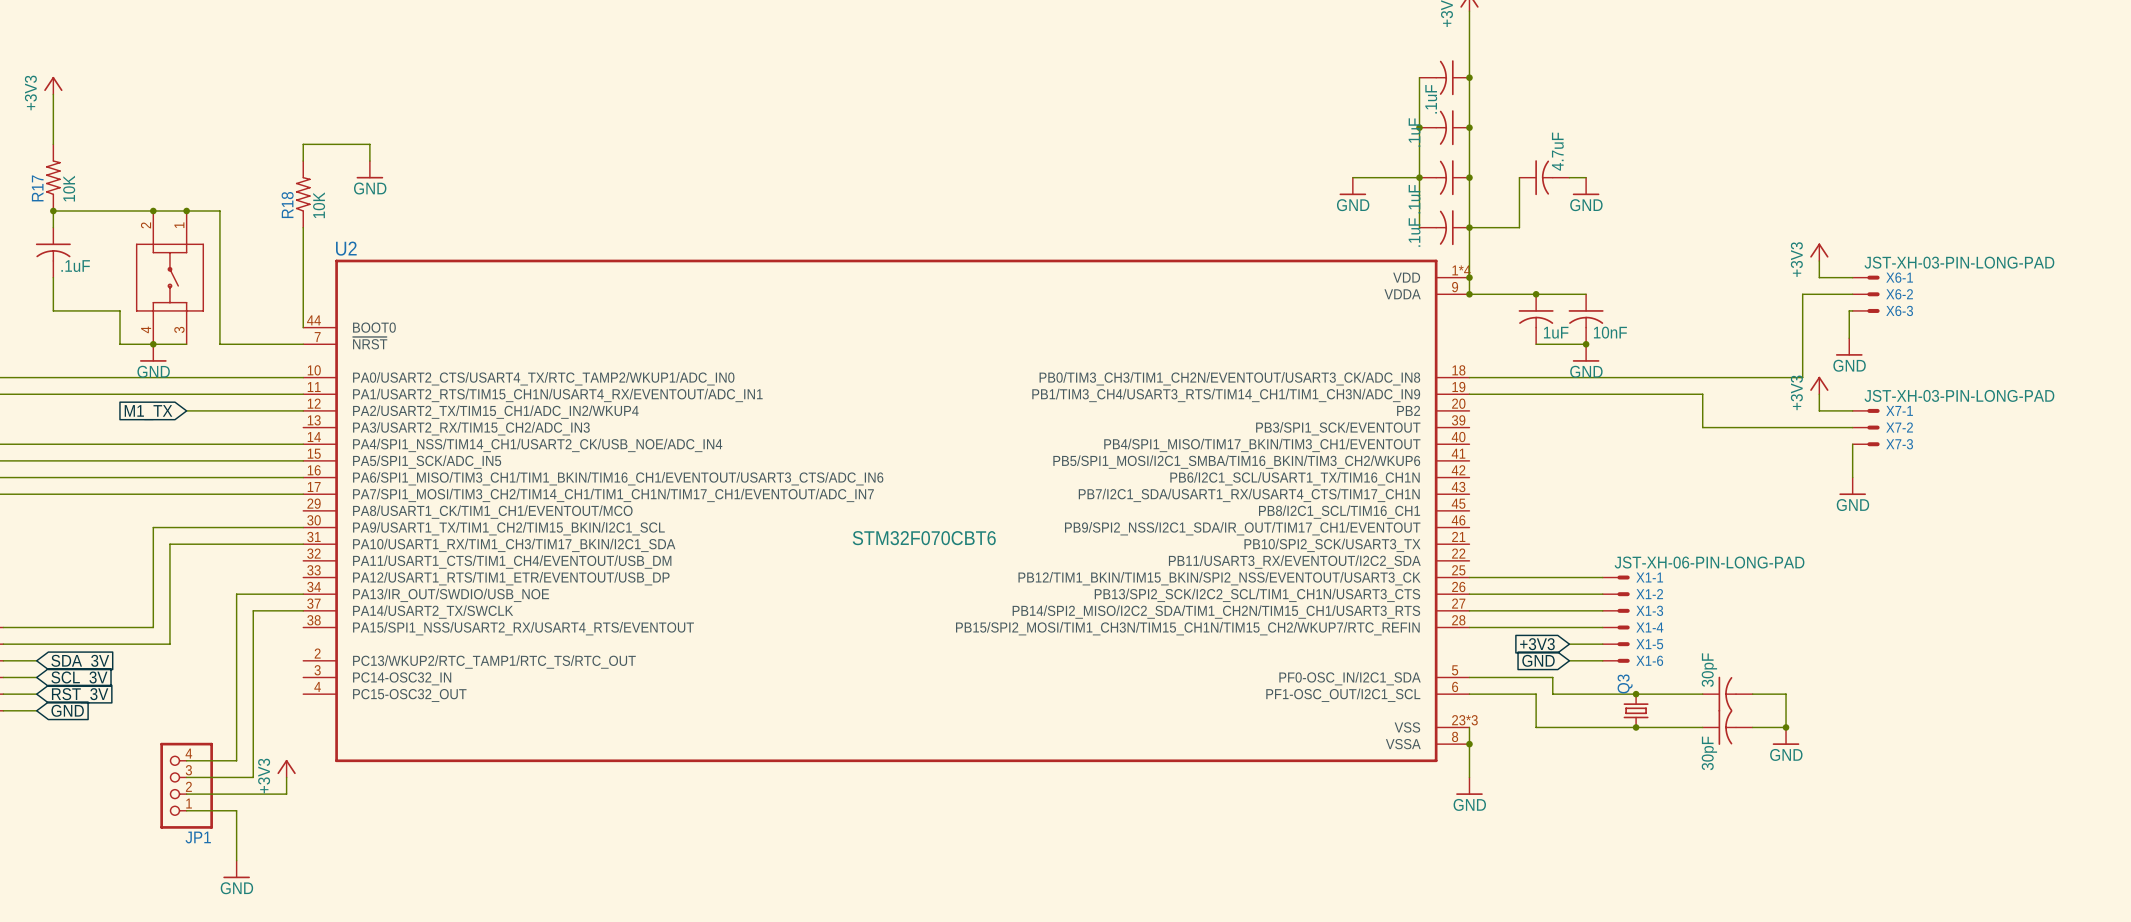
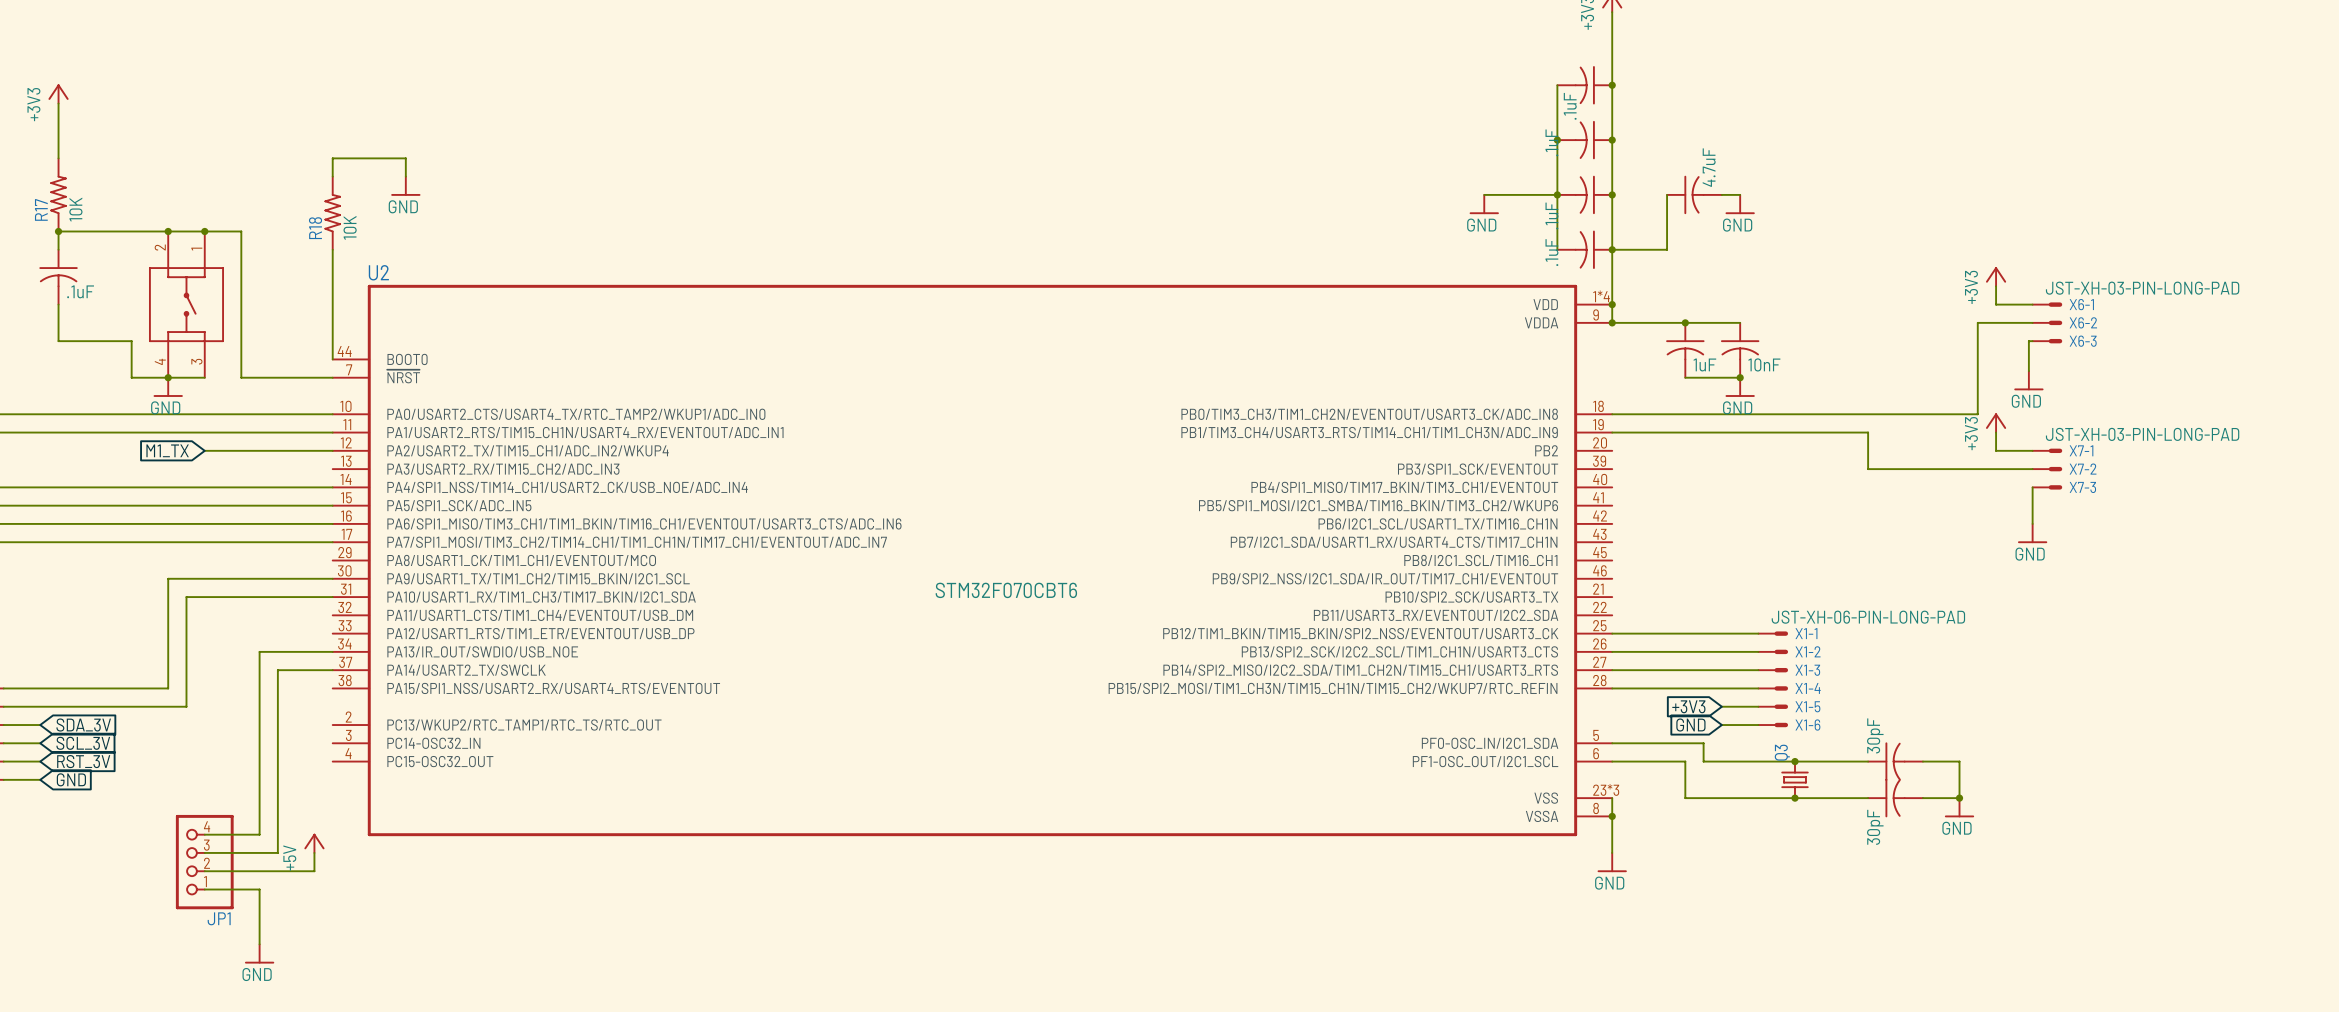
power symbol: +3V3 (286, 768) -> +5V (314, 843)

